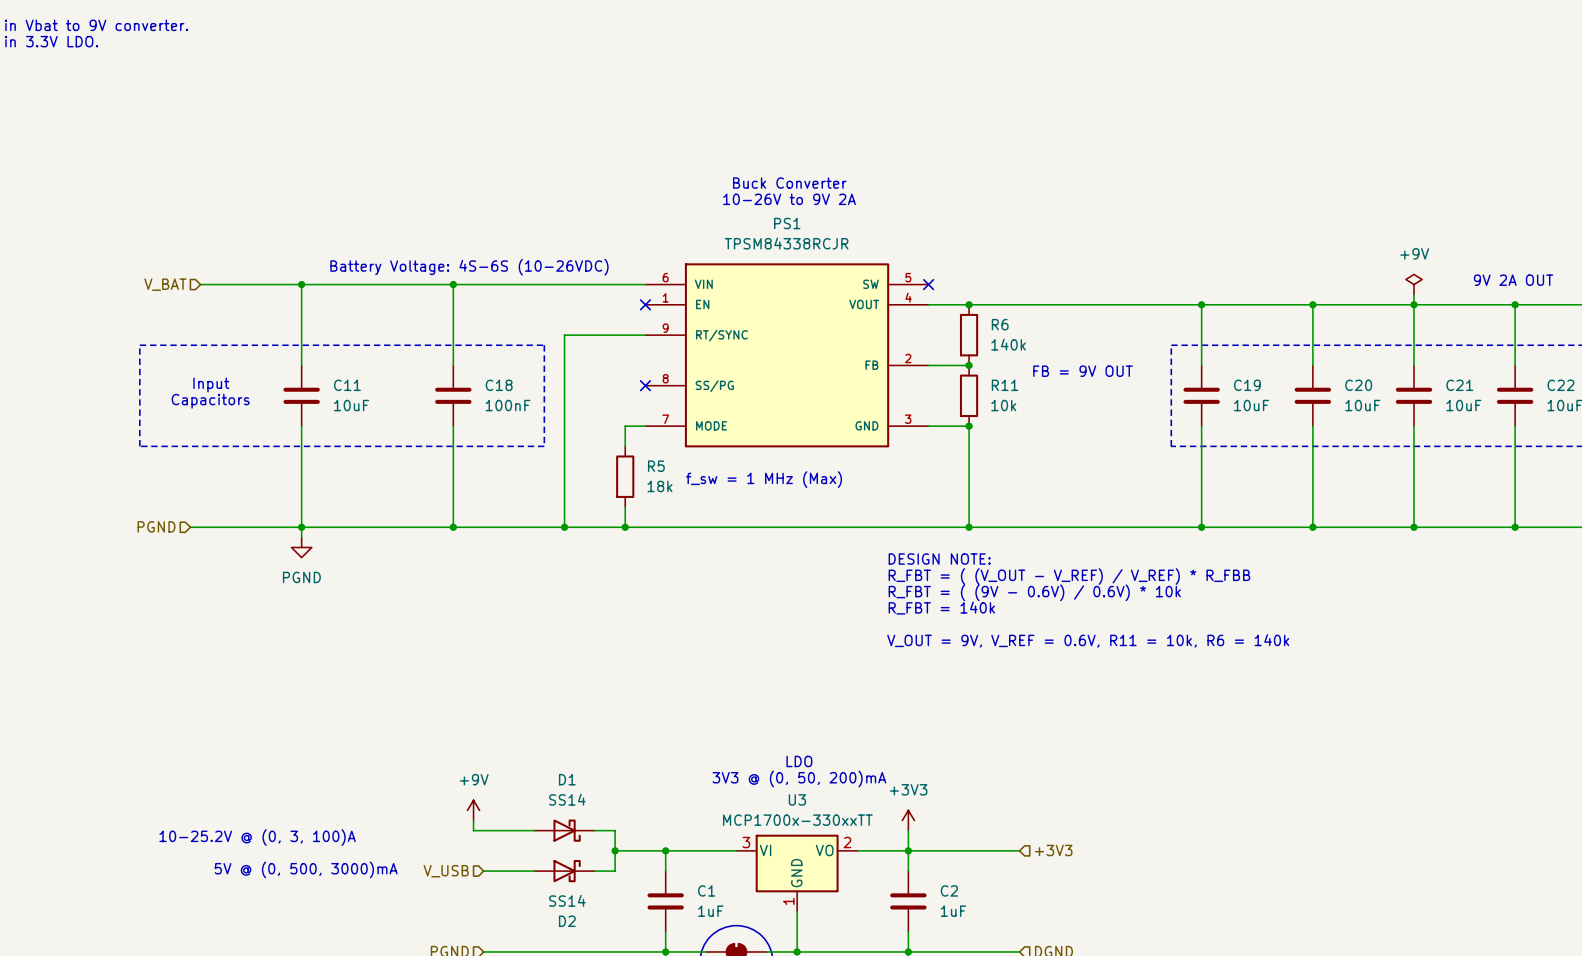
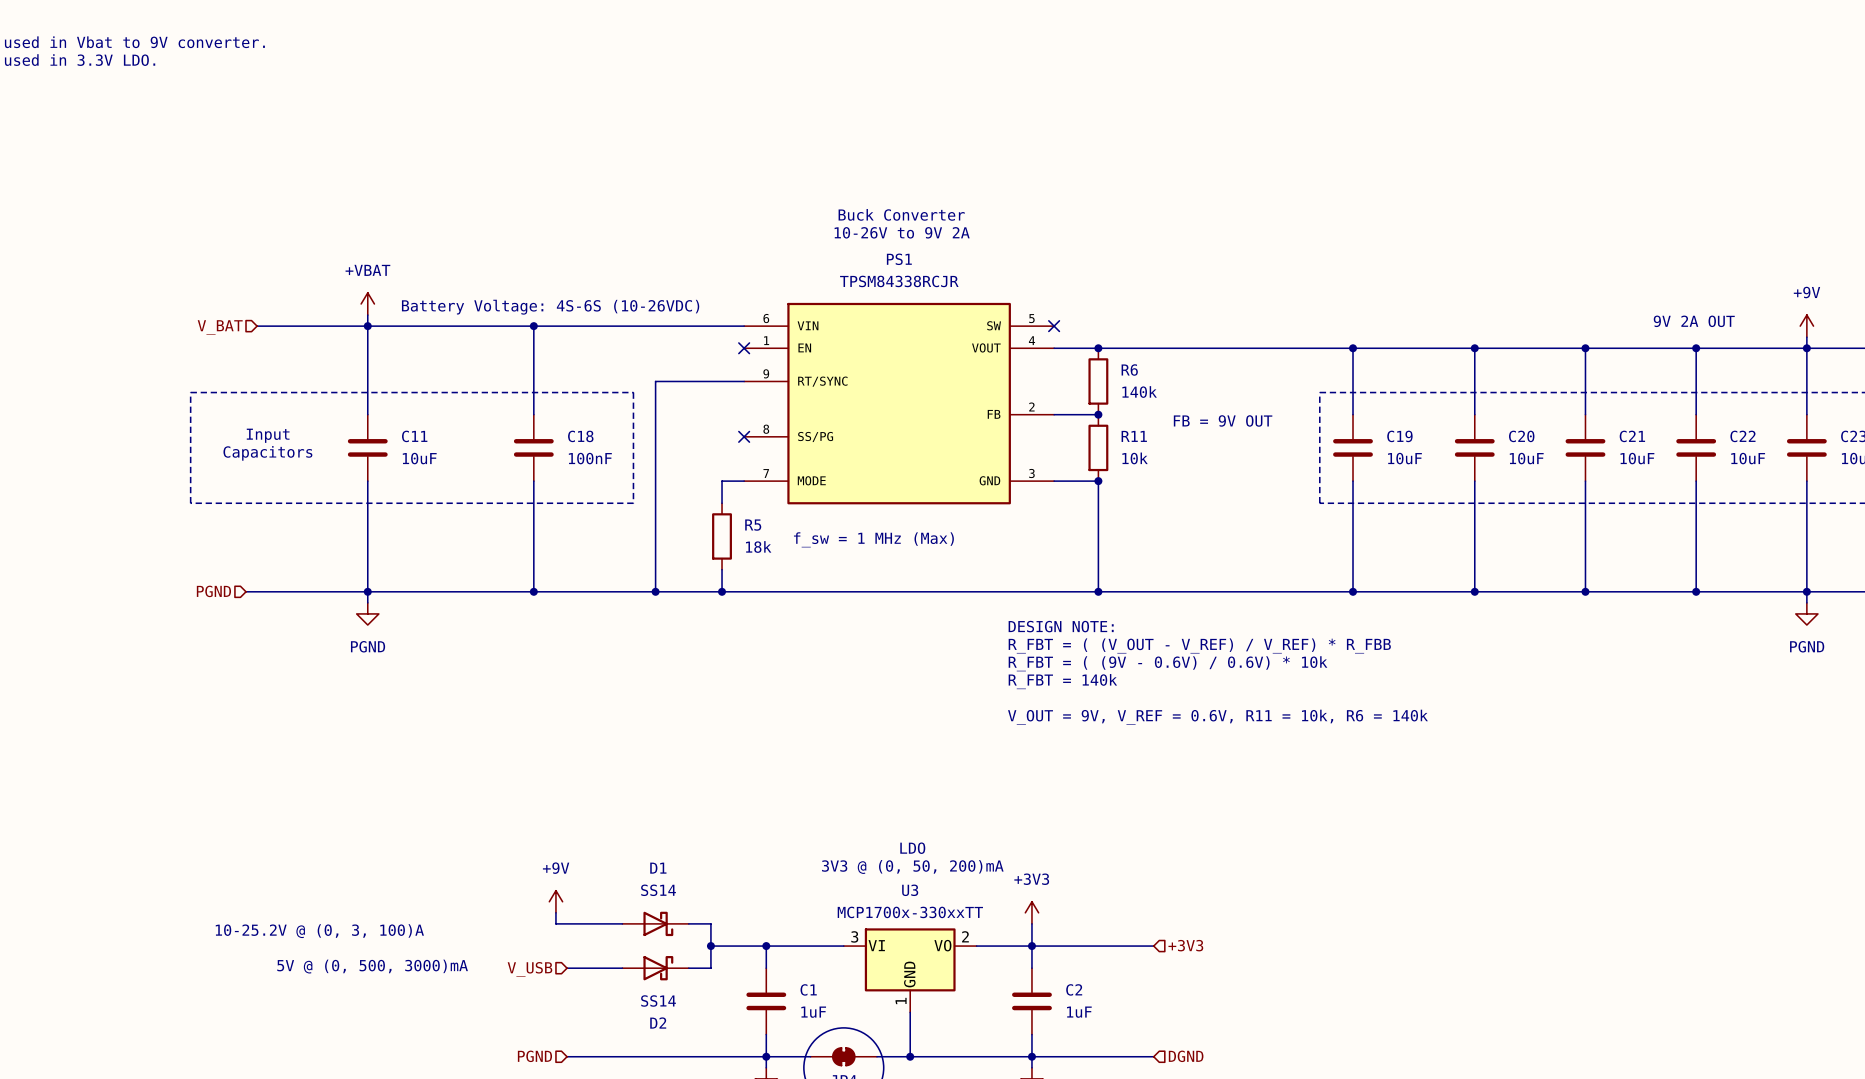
power symbol: none -> +VBAT (367, 303)
wire: none -> (367, 315) (367, 326)
power symbol: +9V (1413, 284) -> none
wire: (1413, 294) (1413, 304) -> none

